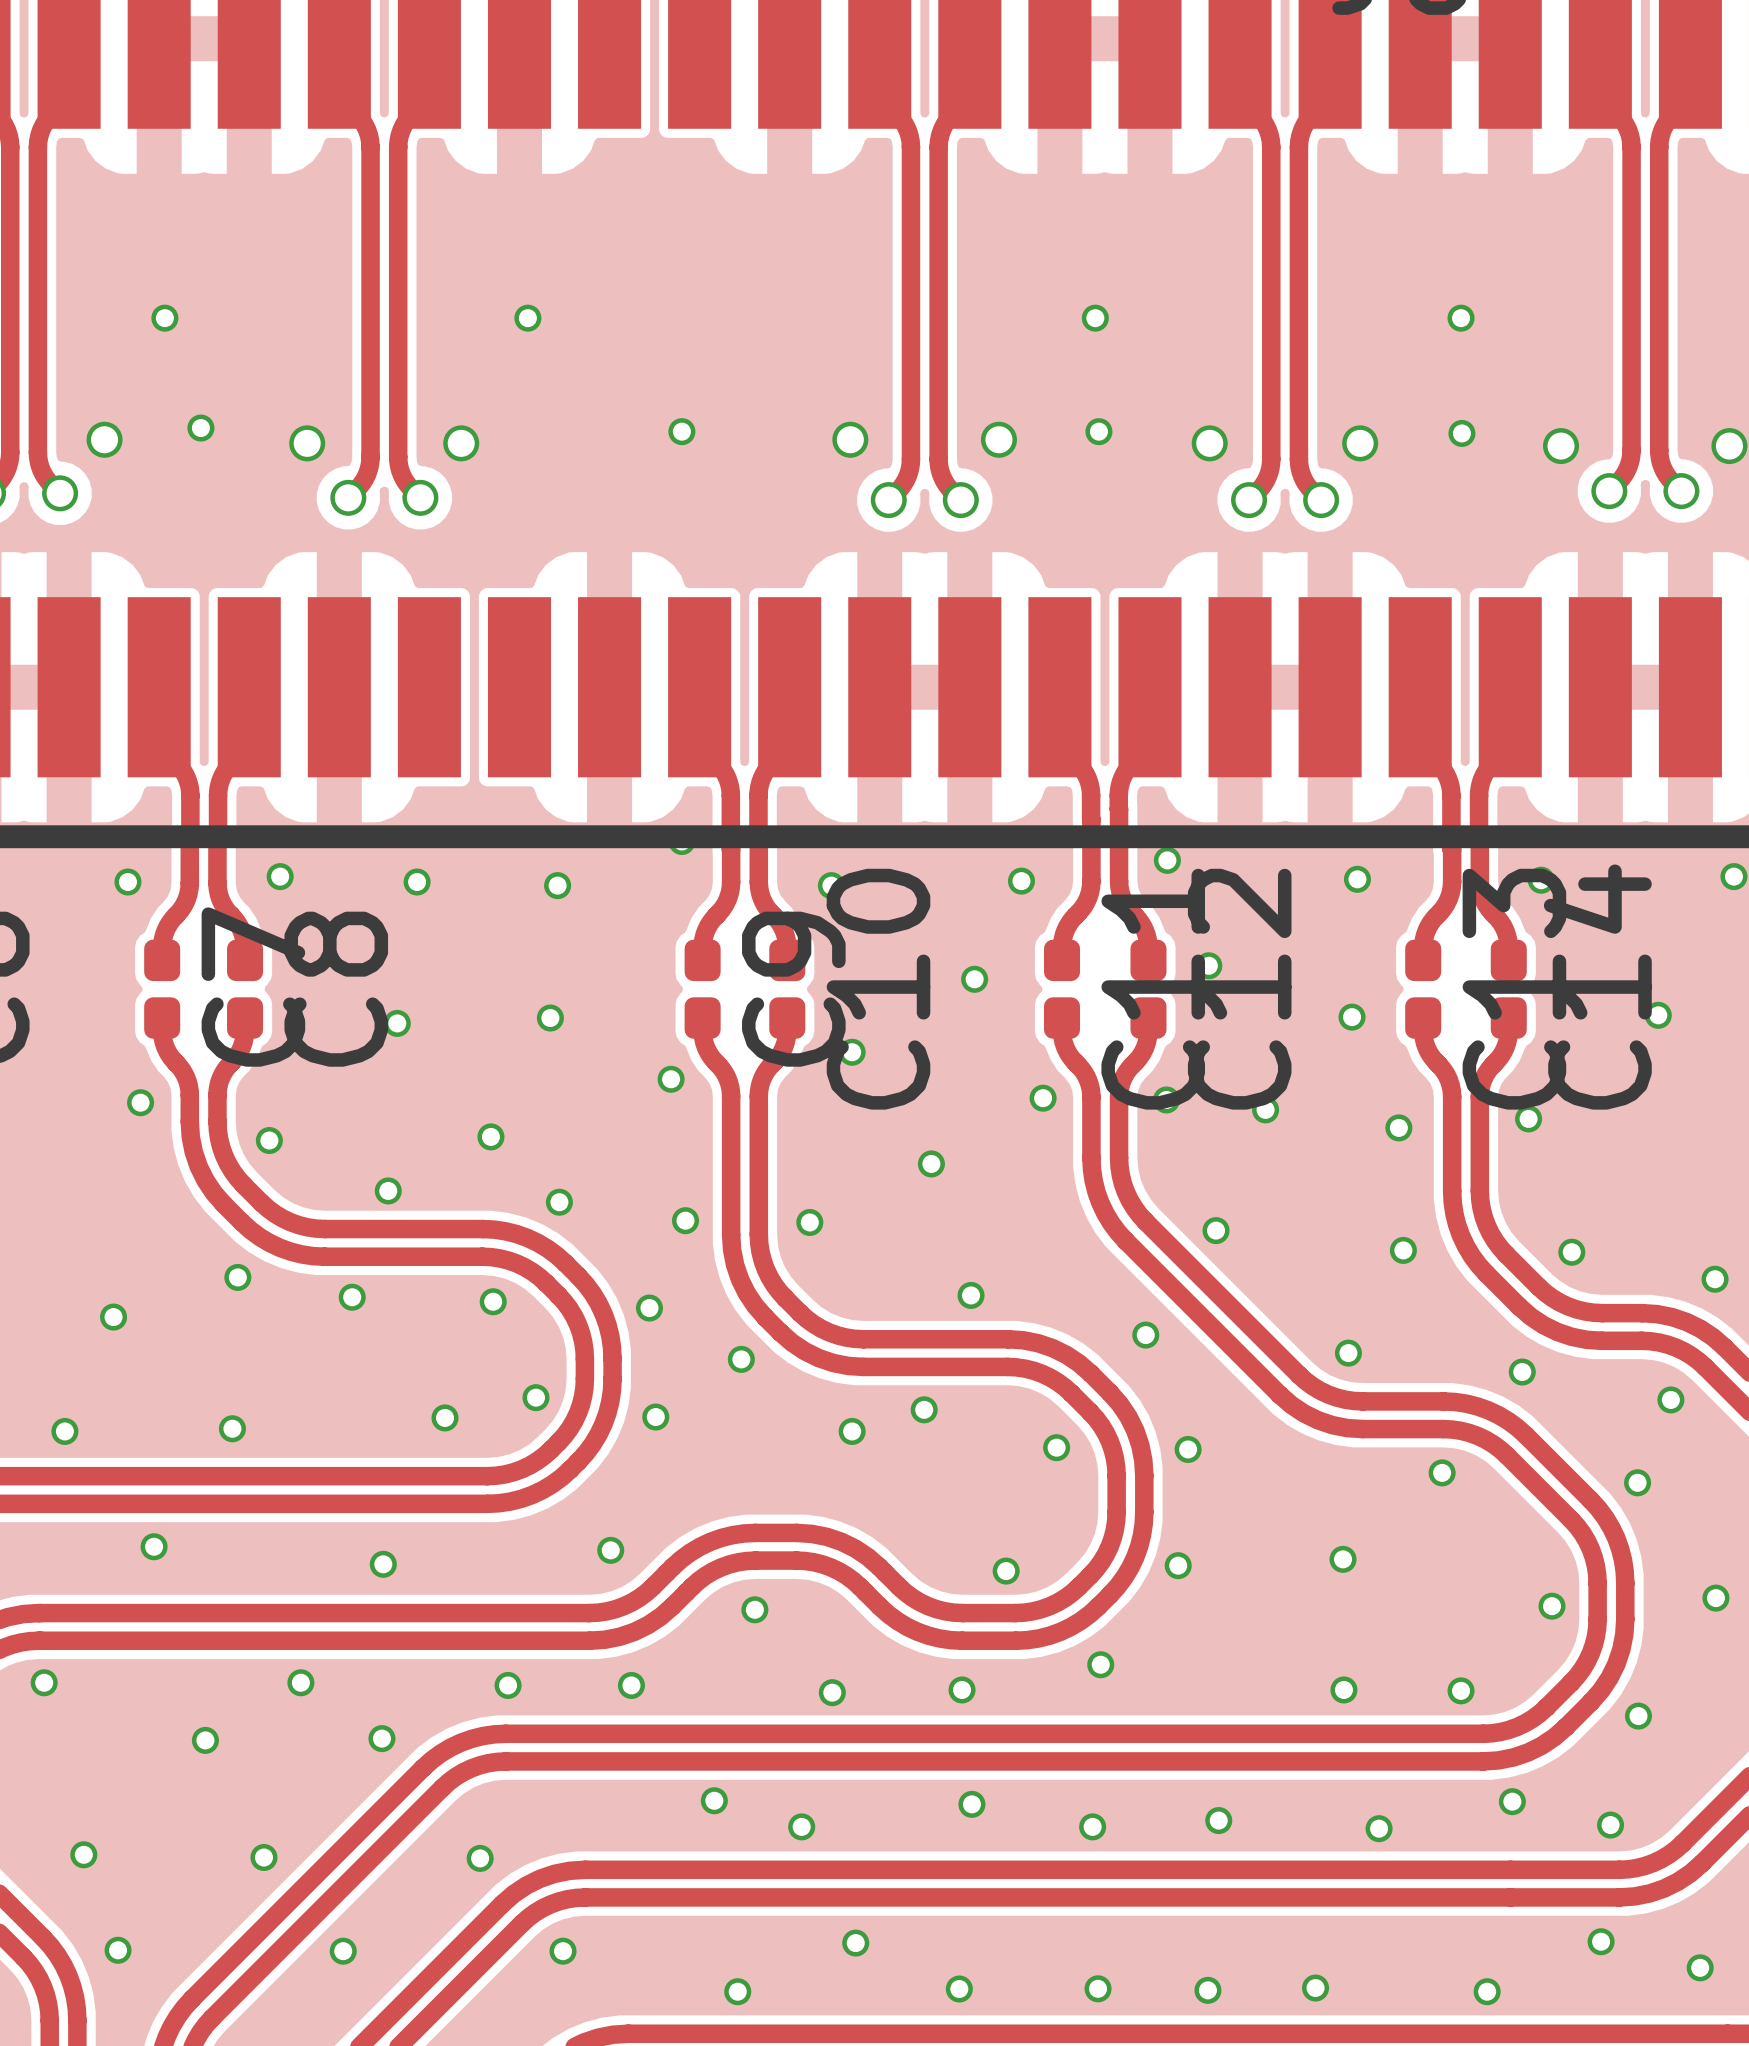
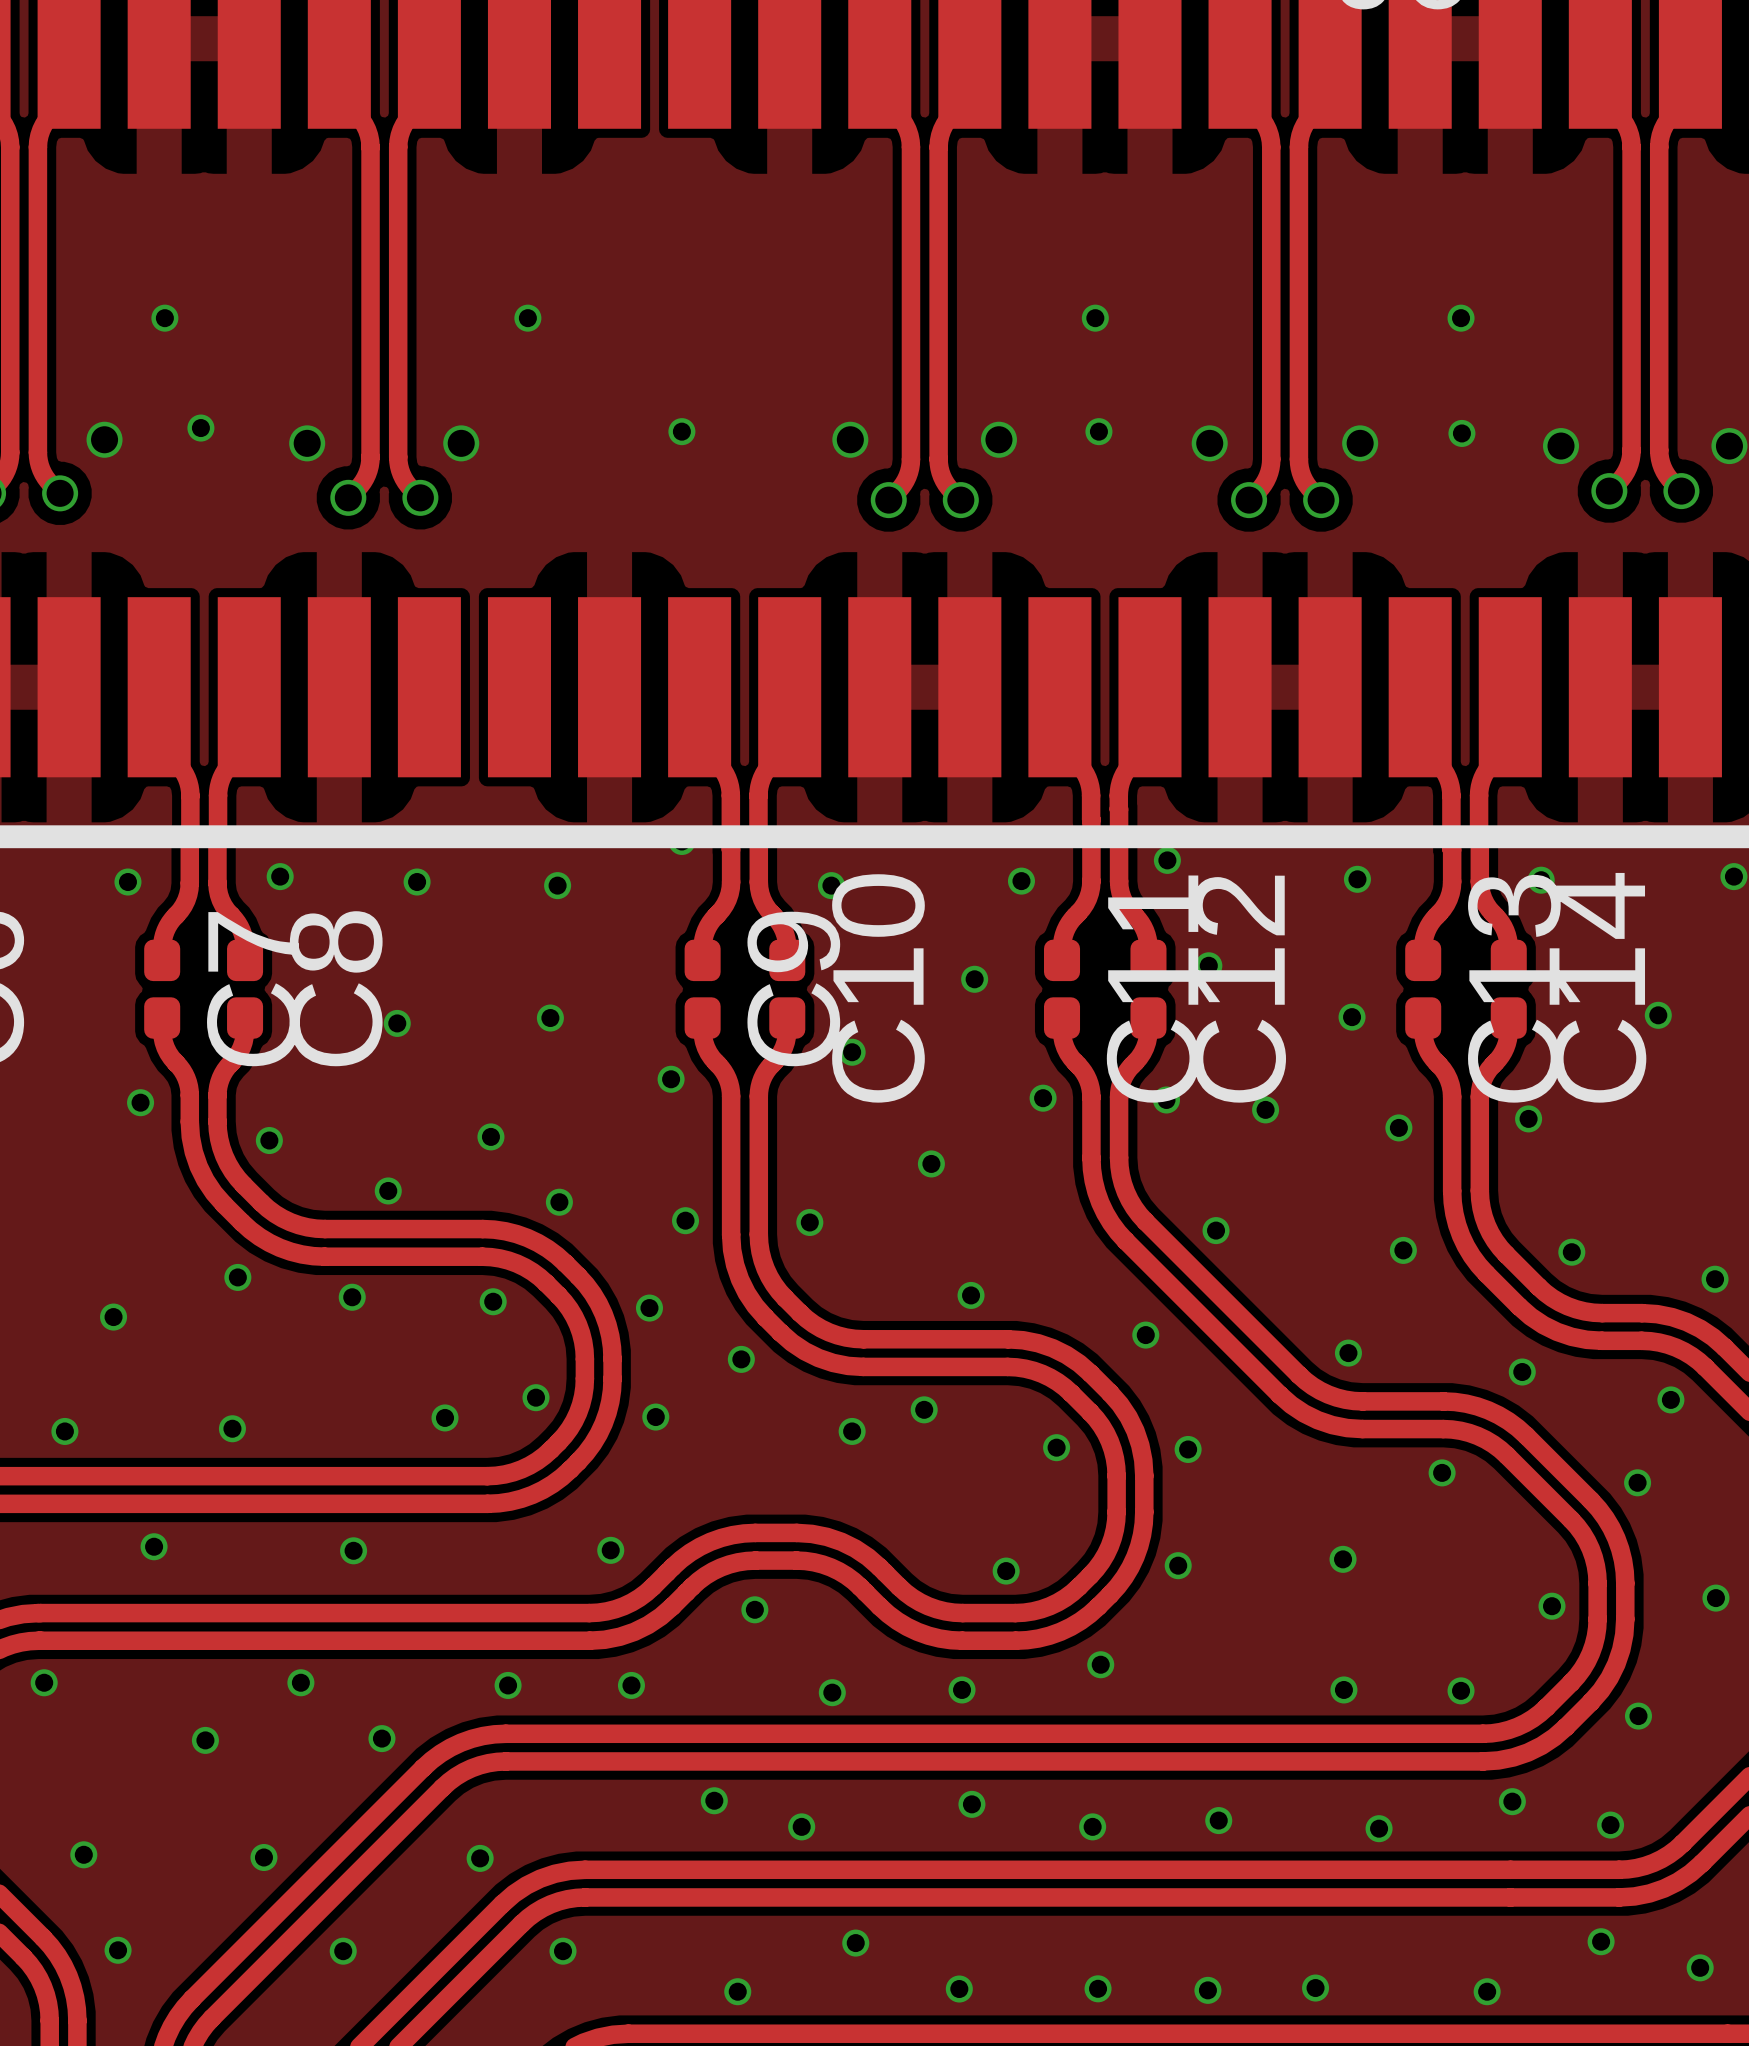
via position: (383, 1564) -> (353, 1550)

